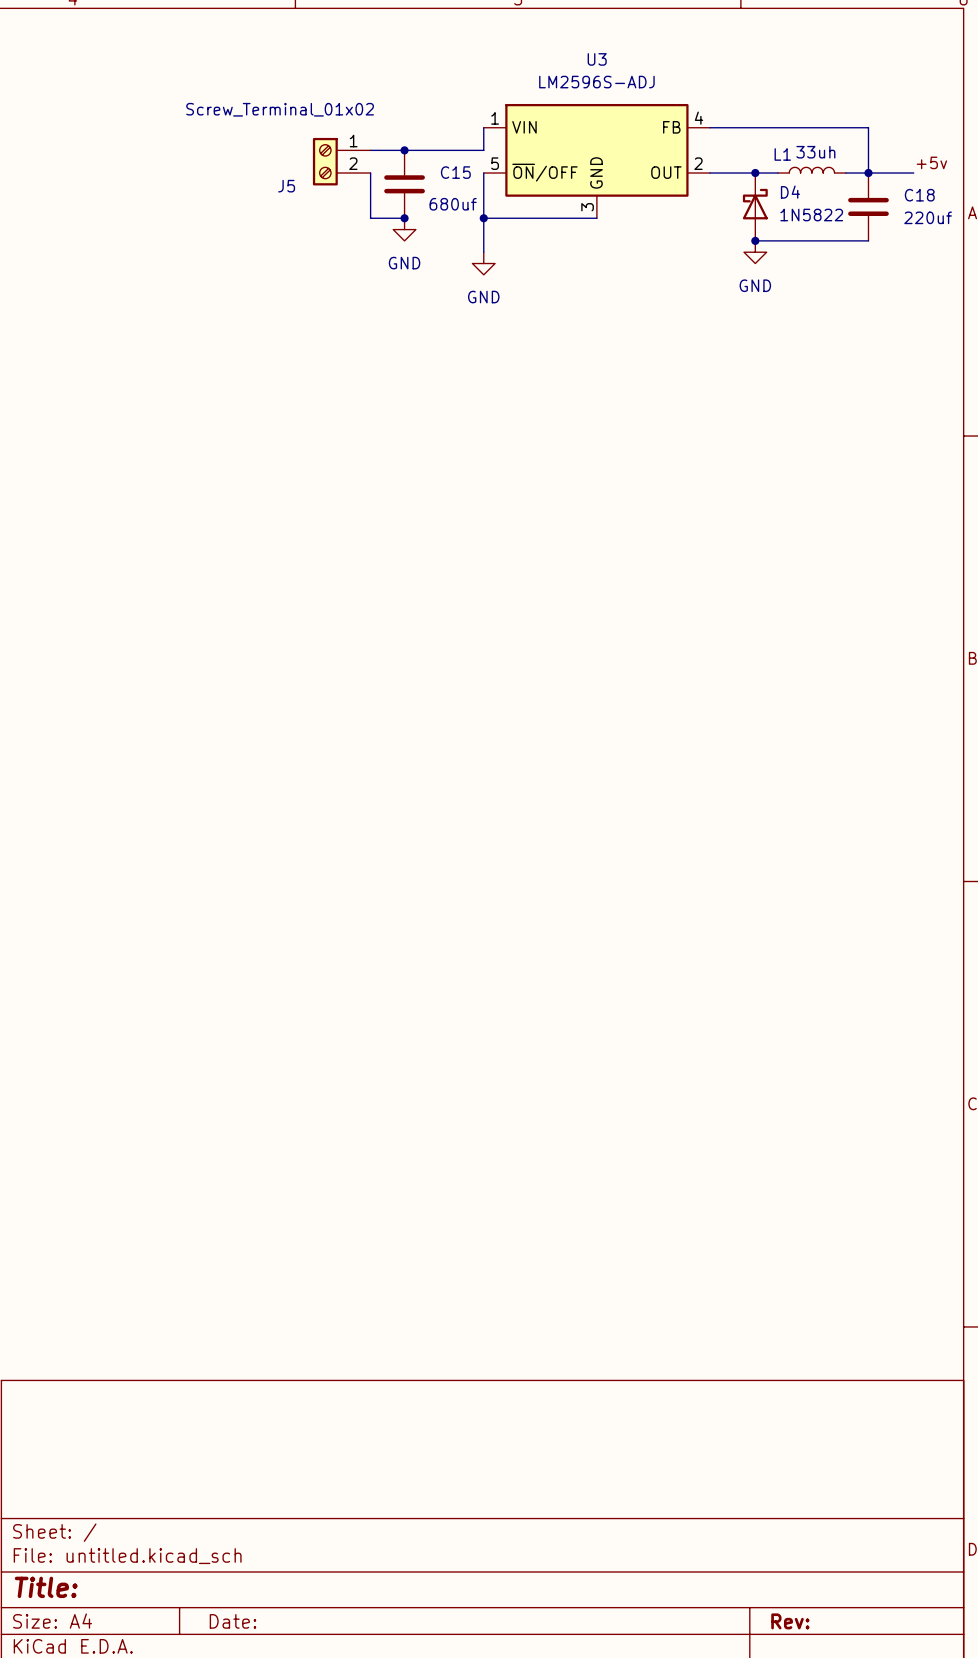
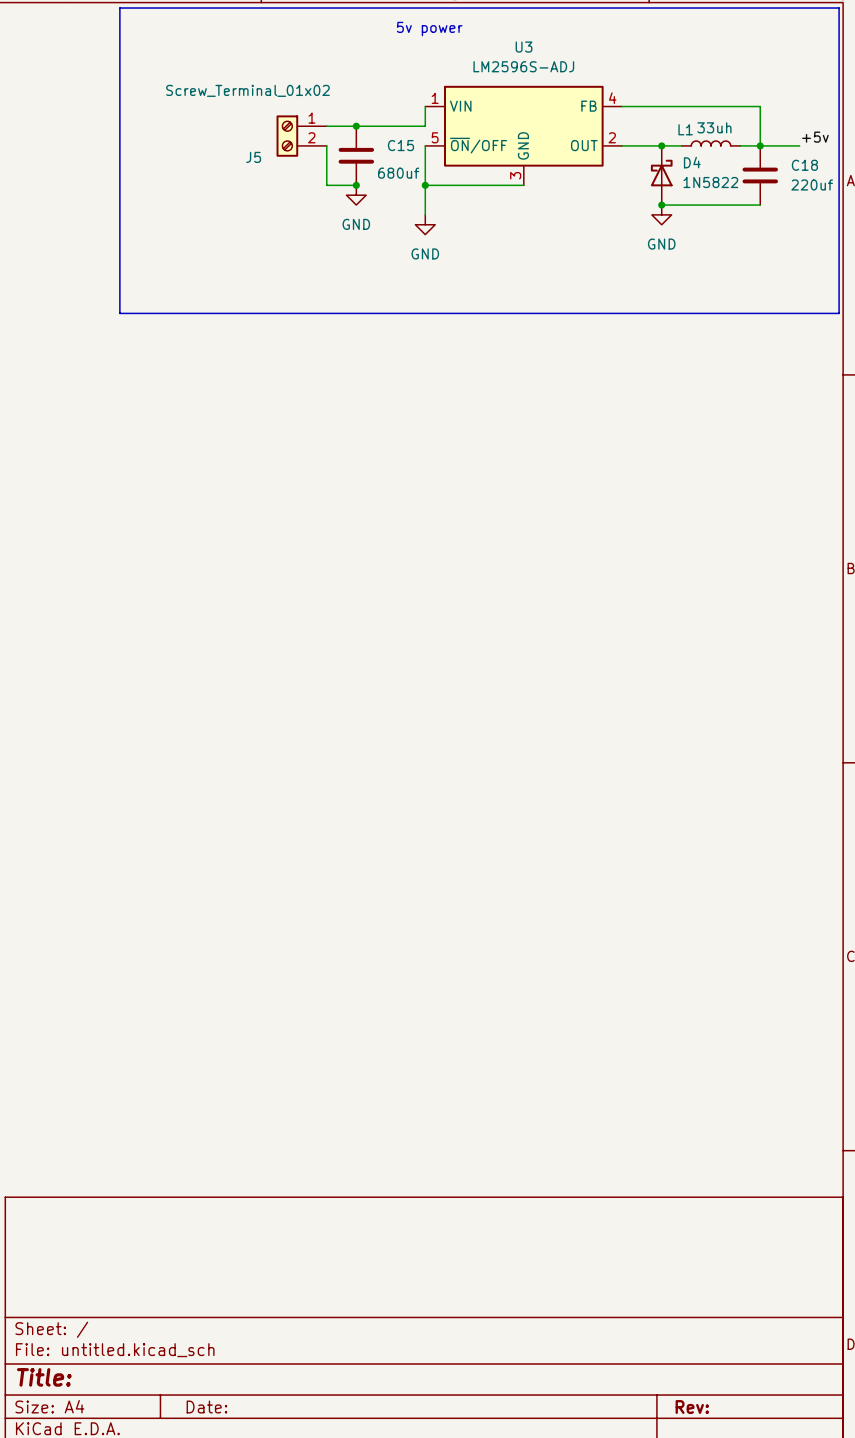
line: none -> (119, 8) (839, 8) (839, 313) (119, 313) (119, 8)
text: none -> 5v power (429, 29)

